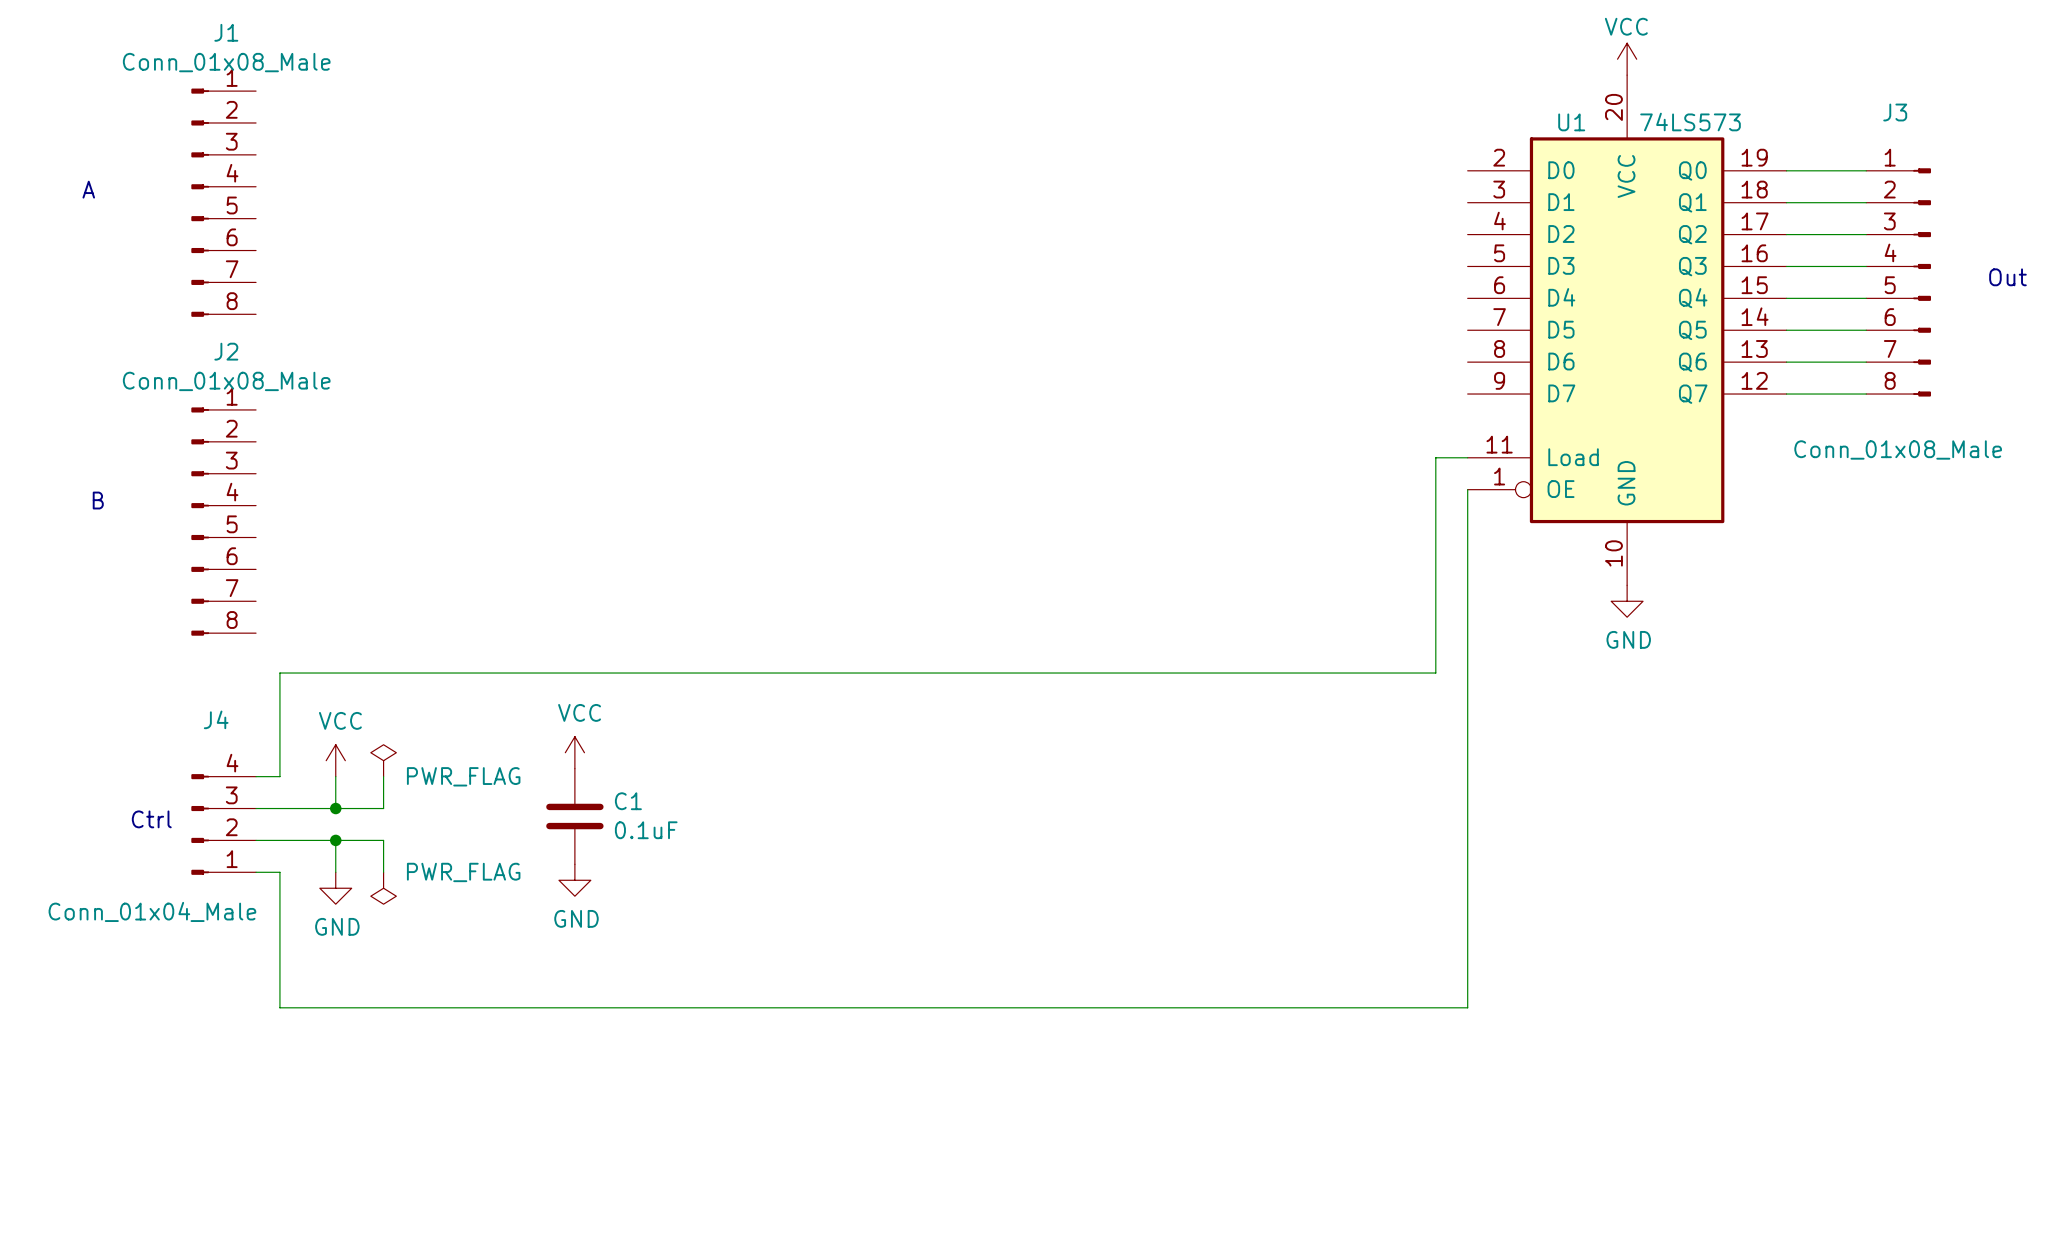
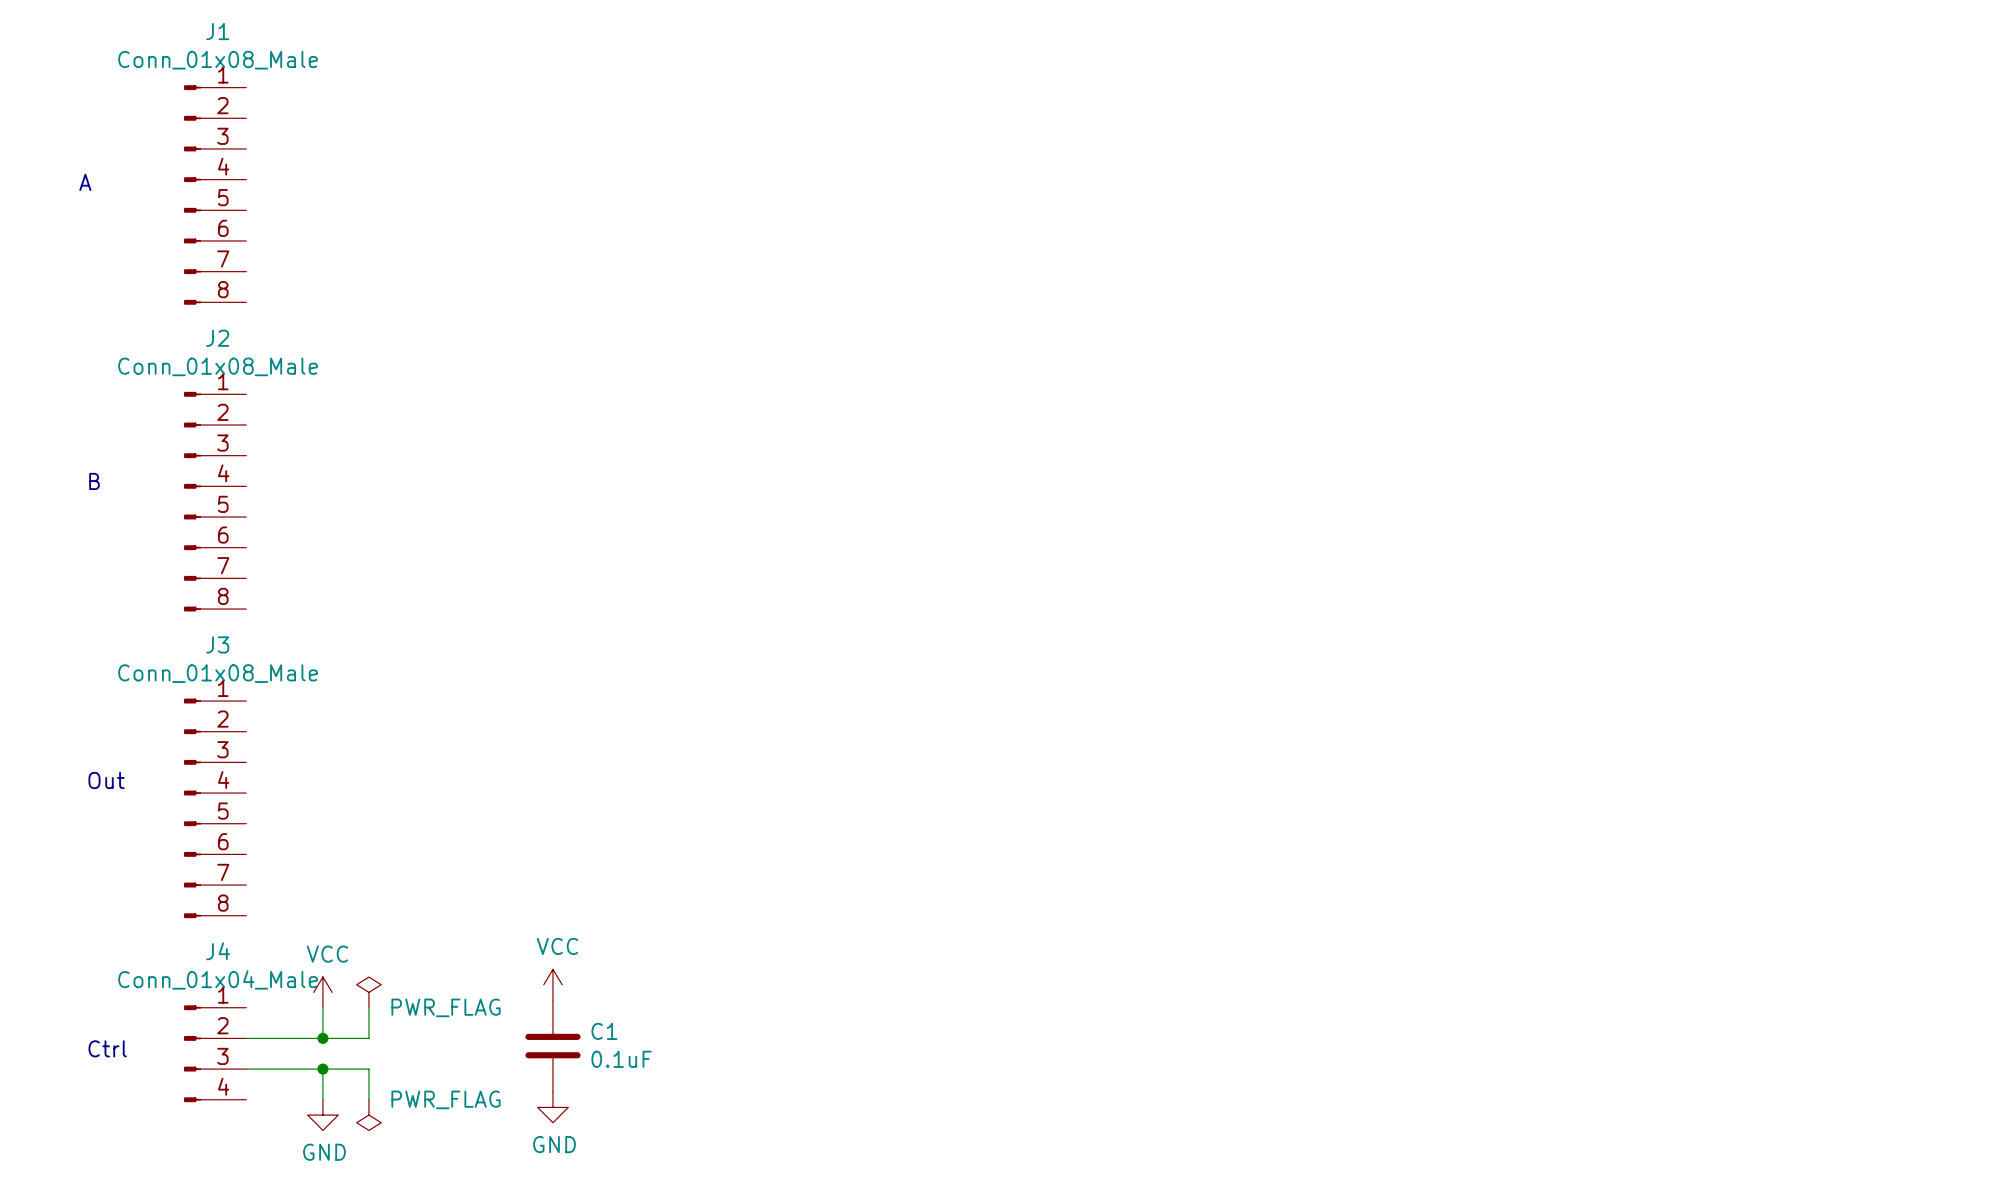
power symbol: VCC (1627, 59) -> none
wire: (1786, 170) (1866, 170) -> none
wire: (1786, 202) (1866, 202) -> none
wire: (1786, 234) (1866, 234) -> none
wire: (1786, 266) (1866, 266) -> none
text: Out (2007, 277) -> none
J3 position: (1898, 282) -> (215, 808)
J3 flip: as is (1922, 282) -> left-right (192, 808)
wire: (1786, 298) (1866, 298) -> none
U1: 74LS573 (1627, 330) -> none
wire: (1786, 330) (1866, 330) -> none
wire: (1786, 362) (1866, 362) -> none
wire: (1786, 394) (1866, 394) -> none
J3 value position: Conn_01x08_Male (1898, 449) -> Conn_01x08_Male (218, 673)
wire: (1467, 457) (1435, 457) (1435, 673) (279, 673) (279, 776) (256, 776) -> none
wire: (1467, 489) (1467, 1007) (279, 1007) (279, 872) (256, 872) -> none
power symbol: GND (1627, 601) -> none
power symbol: VCC (574, 752) -> none
power symbol: VCC (335, 760) -> none
power symbol: PWR_FLAG (383, 760) -> none
wire: (335, 776) (335, 808) -> (322, 1007) (322, 1038)
wire: (383, 776) (383, 808) (256, 808) -> (368, 1007) (368, 1038) (246, 1038)
junction: (335, 808) -> none
text: none -> Out (106, 780)
C1 position: (574, 816) -> (552, 1046)
text position: Ctrl (151, 819) -> Ctrl (107, 1048)
J4 flip: as is (200, 824) -> up-down (192, 1053)
J4 position: (223, 824) -> (215, 1053)
wire: (256, 840) (383, 840) (383, 872) -> (246, 1069) (368, 1069) (368, 1099)
wire: (335, 840) (335, 872) -> (322, 1069) (322, 1099)
junction: (335, 840) -> none
power symbol: GND (574, 880) -> none
power symbol: GND (335, 888) -> none
power symbol: PWR_FLAG (383, 888) -> none
J4 value position: Conn_01x04_Male (152, 911) -> Conn_01x04_Male (218, 979)
power symbol: none -> VCC (552, 984)
power symbol: none -> VCC (322, 992)
power symbol: none -> PWR_FLAG (368, 992)
junction: none -> (322, 1038)
junction: none -> (322, 1069)
power symbol: none -> GND (552, 1107)
power symbol: none -> GND (322, 1115)
power symbol: none -> PWR_FLAG (368, 1115)

